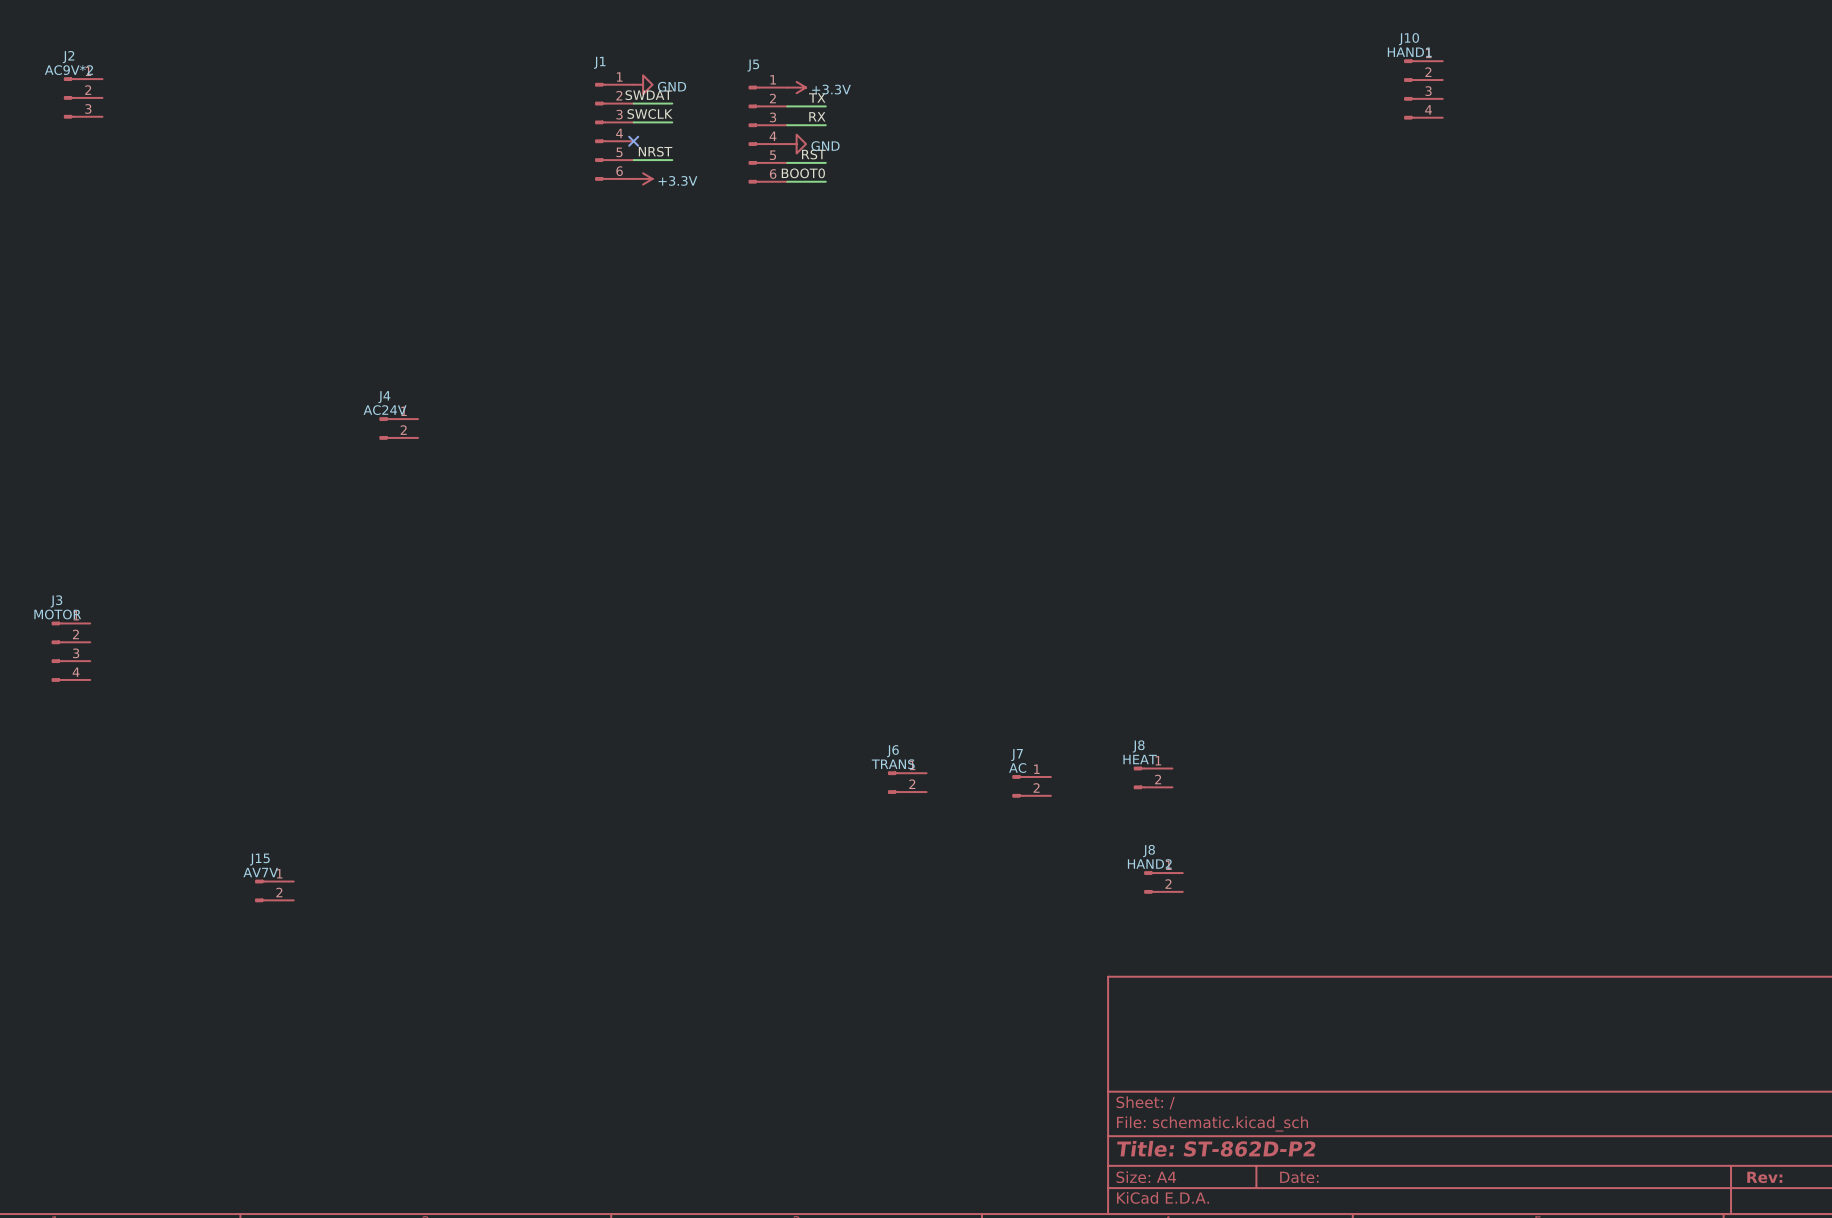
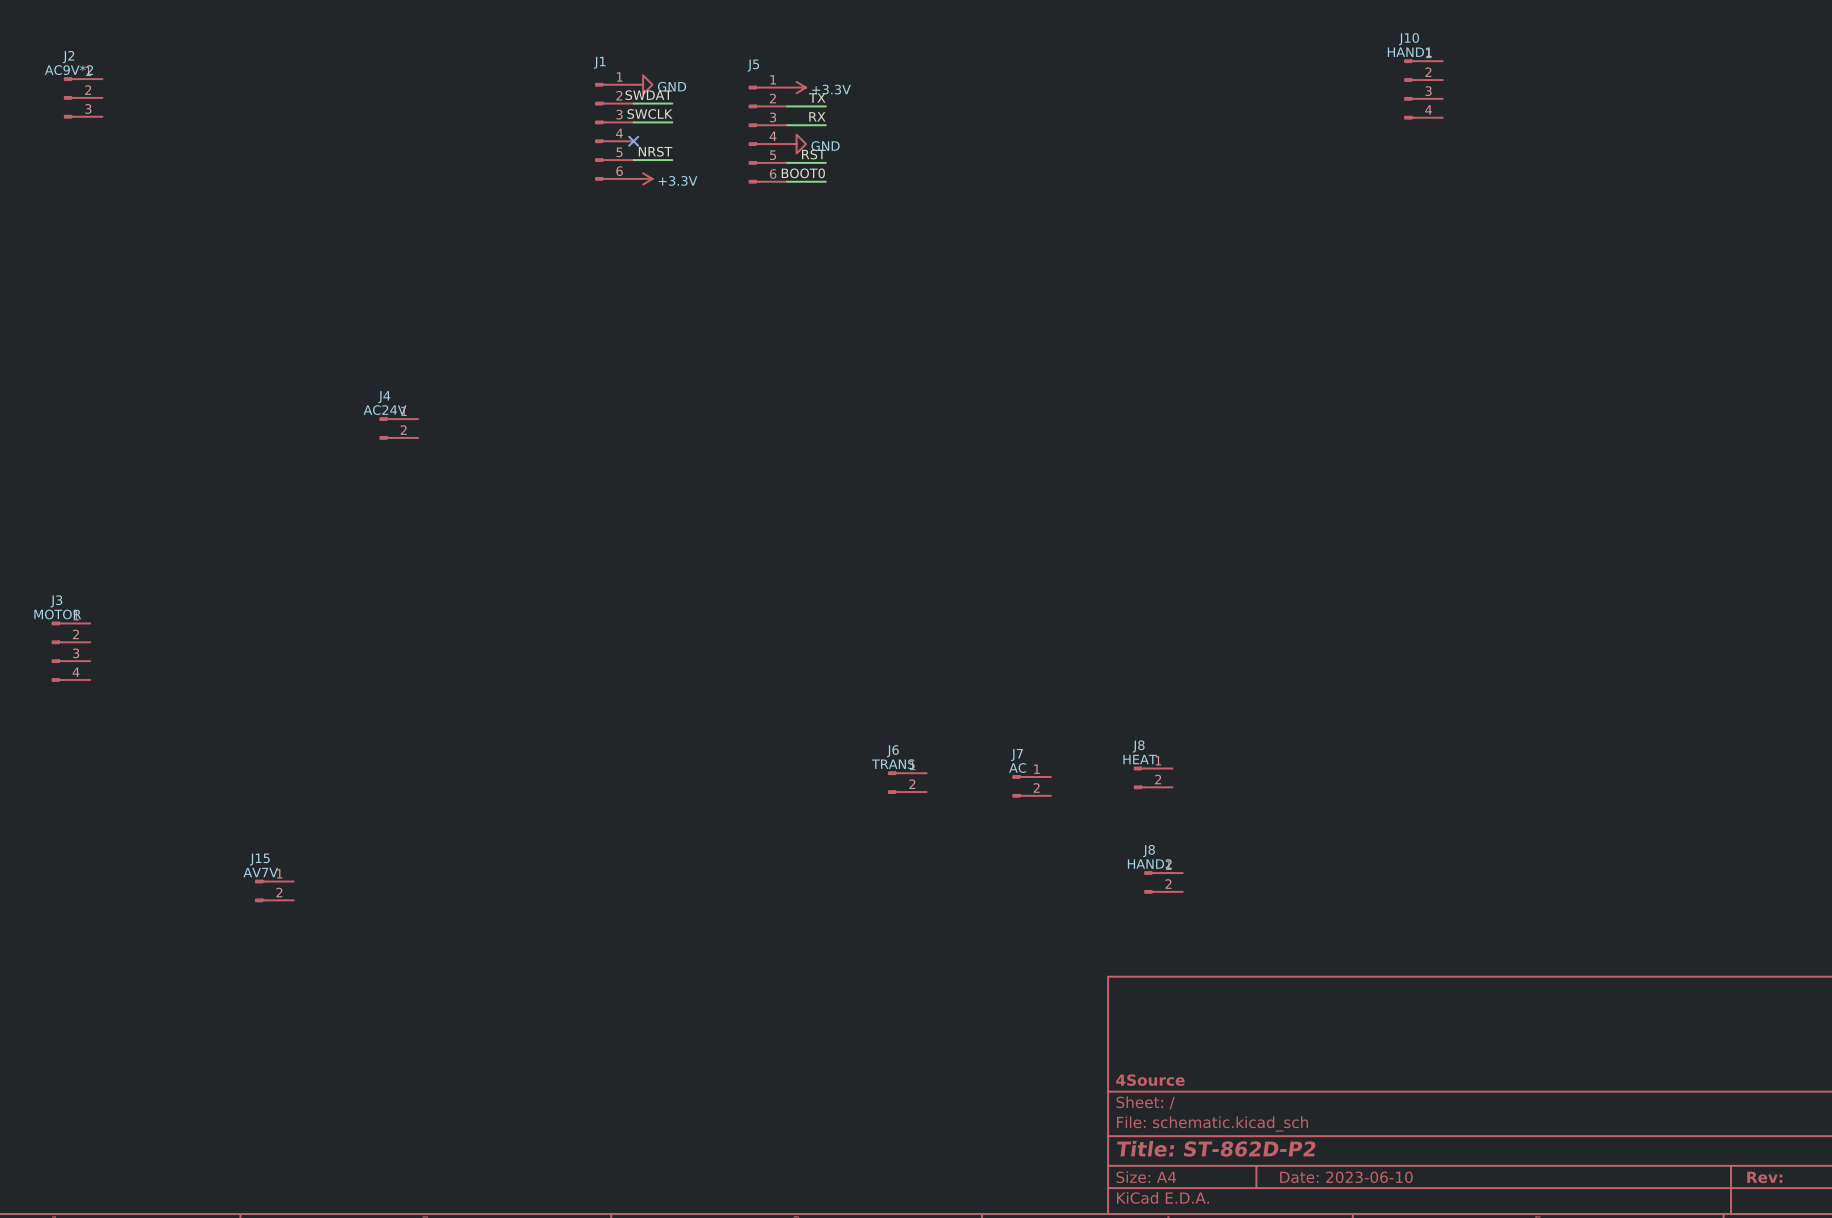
title block: none -> 4Source (1150, 1080)
title block: Date: (1299, 1177) -> Date: 2023-06-10 (1346, 1177)

